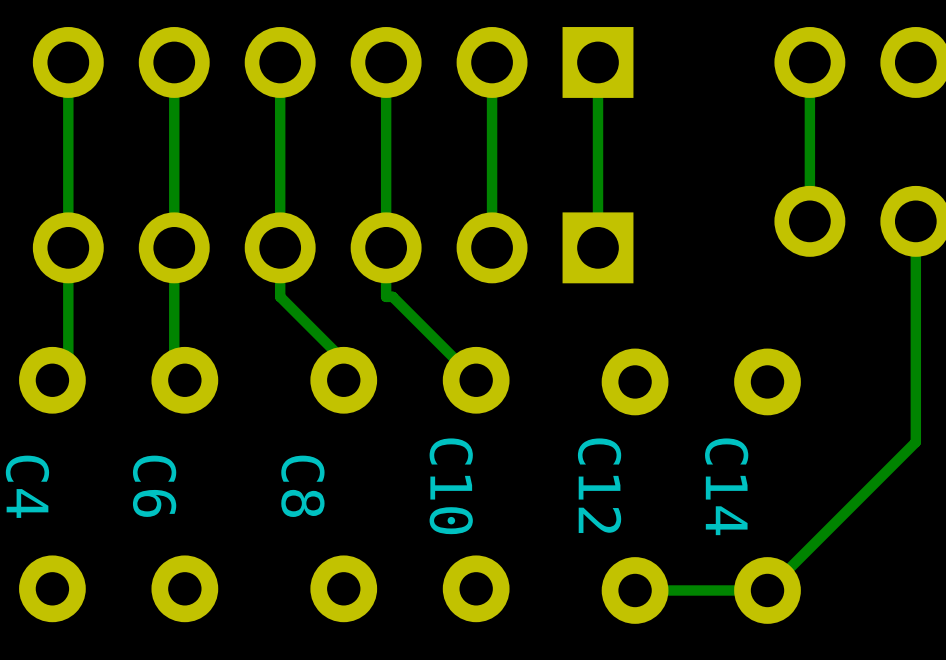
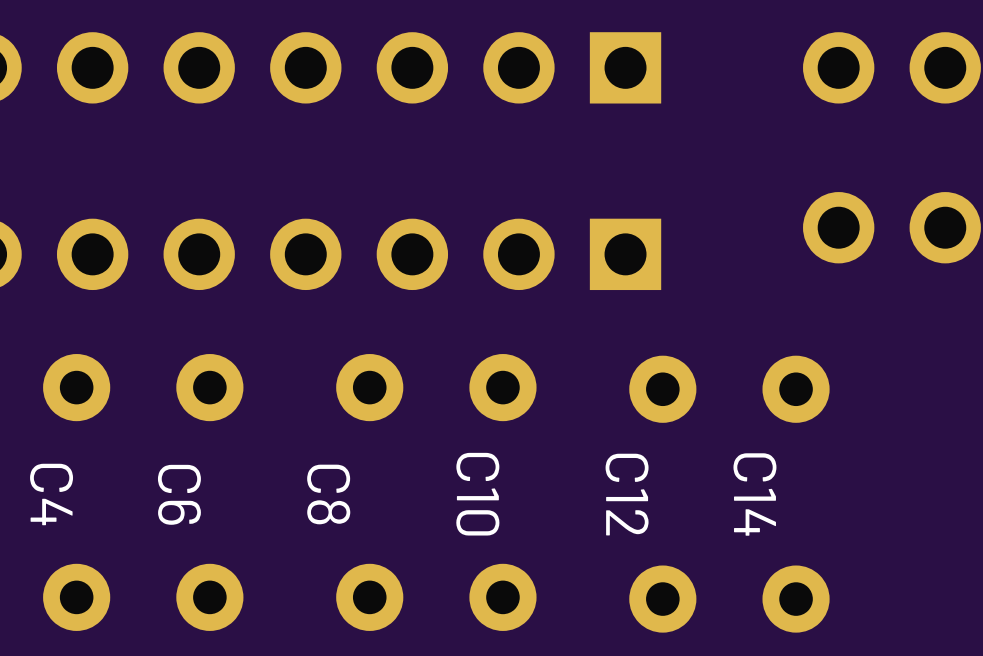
track: (68, 62) (68, 364) (52, 380) -> none
track: (174, 62) (174, 369) (184, 380) -> none
track: (280, 62) (280, 296) (343, 360) (343, 380) -> none
track: (386, 62) (386, 296) (392, 296) (476, 380) -> none
track: (492, 62) (492, 247) -> none
track: (598, 62) (598, 247) -> none
track: (809, 62) (809, 221) -> none
track: (915, 221) (915, 442) (767, 590) (635, 590) -> none

